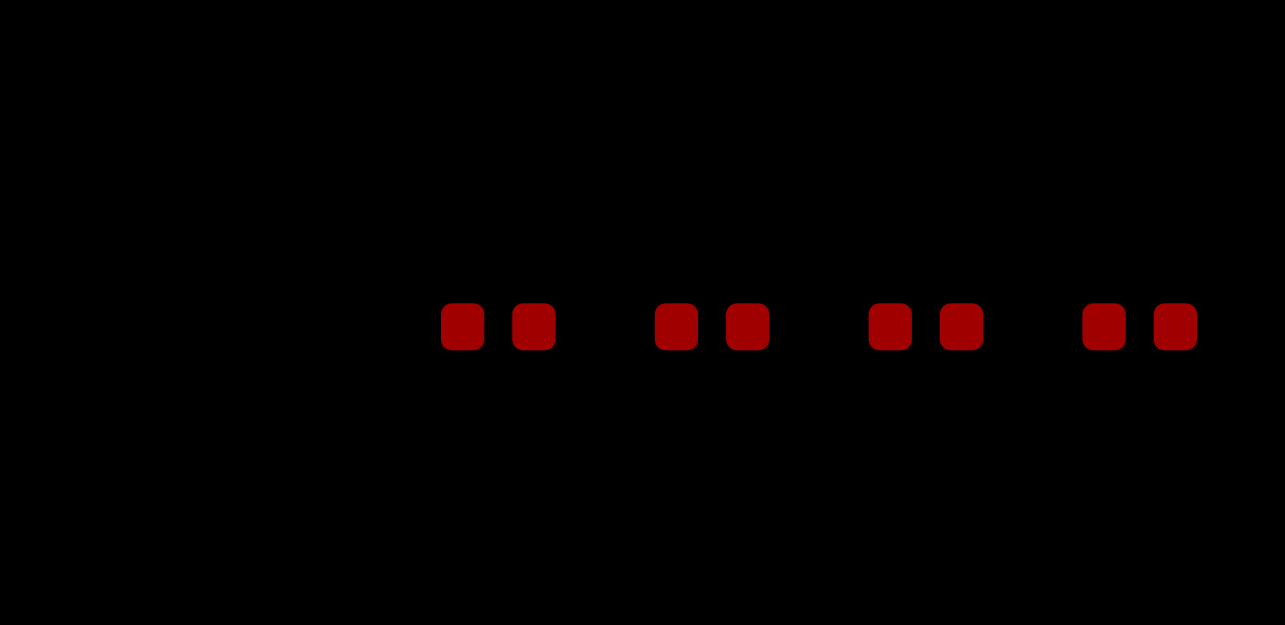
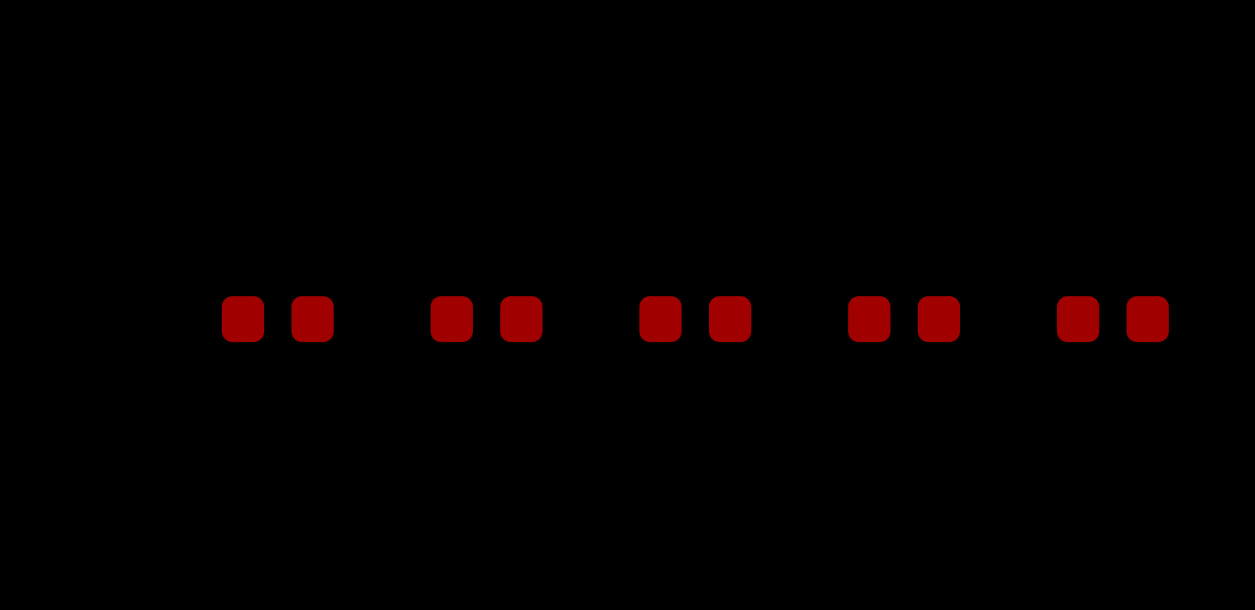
part: none -> (277, 319)

